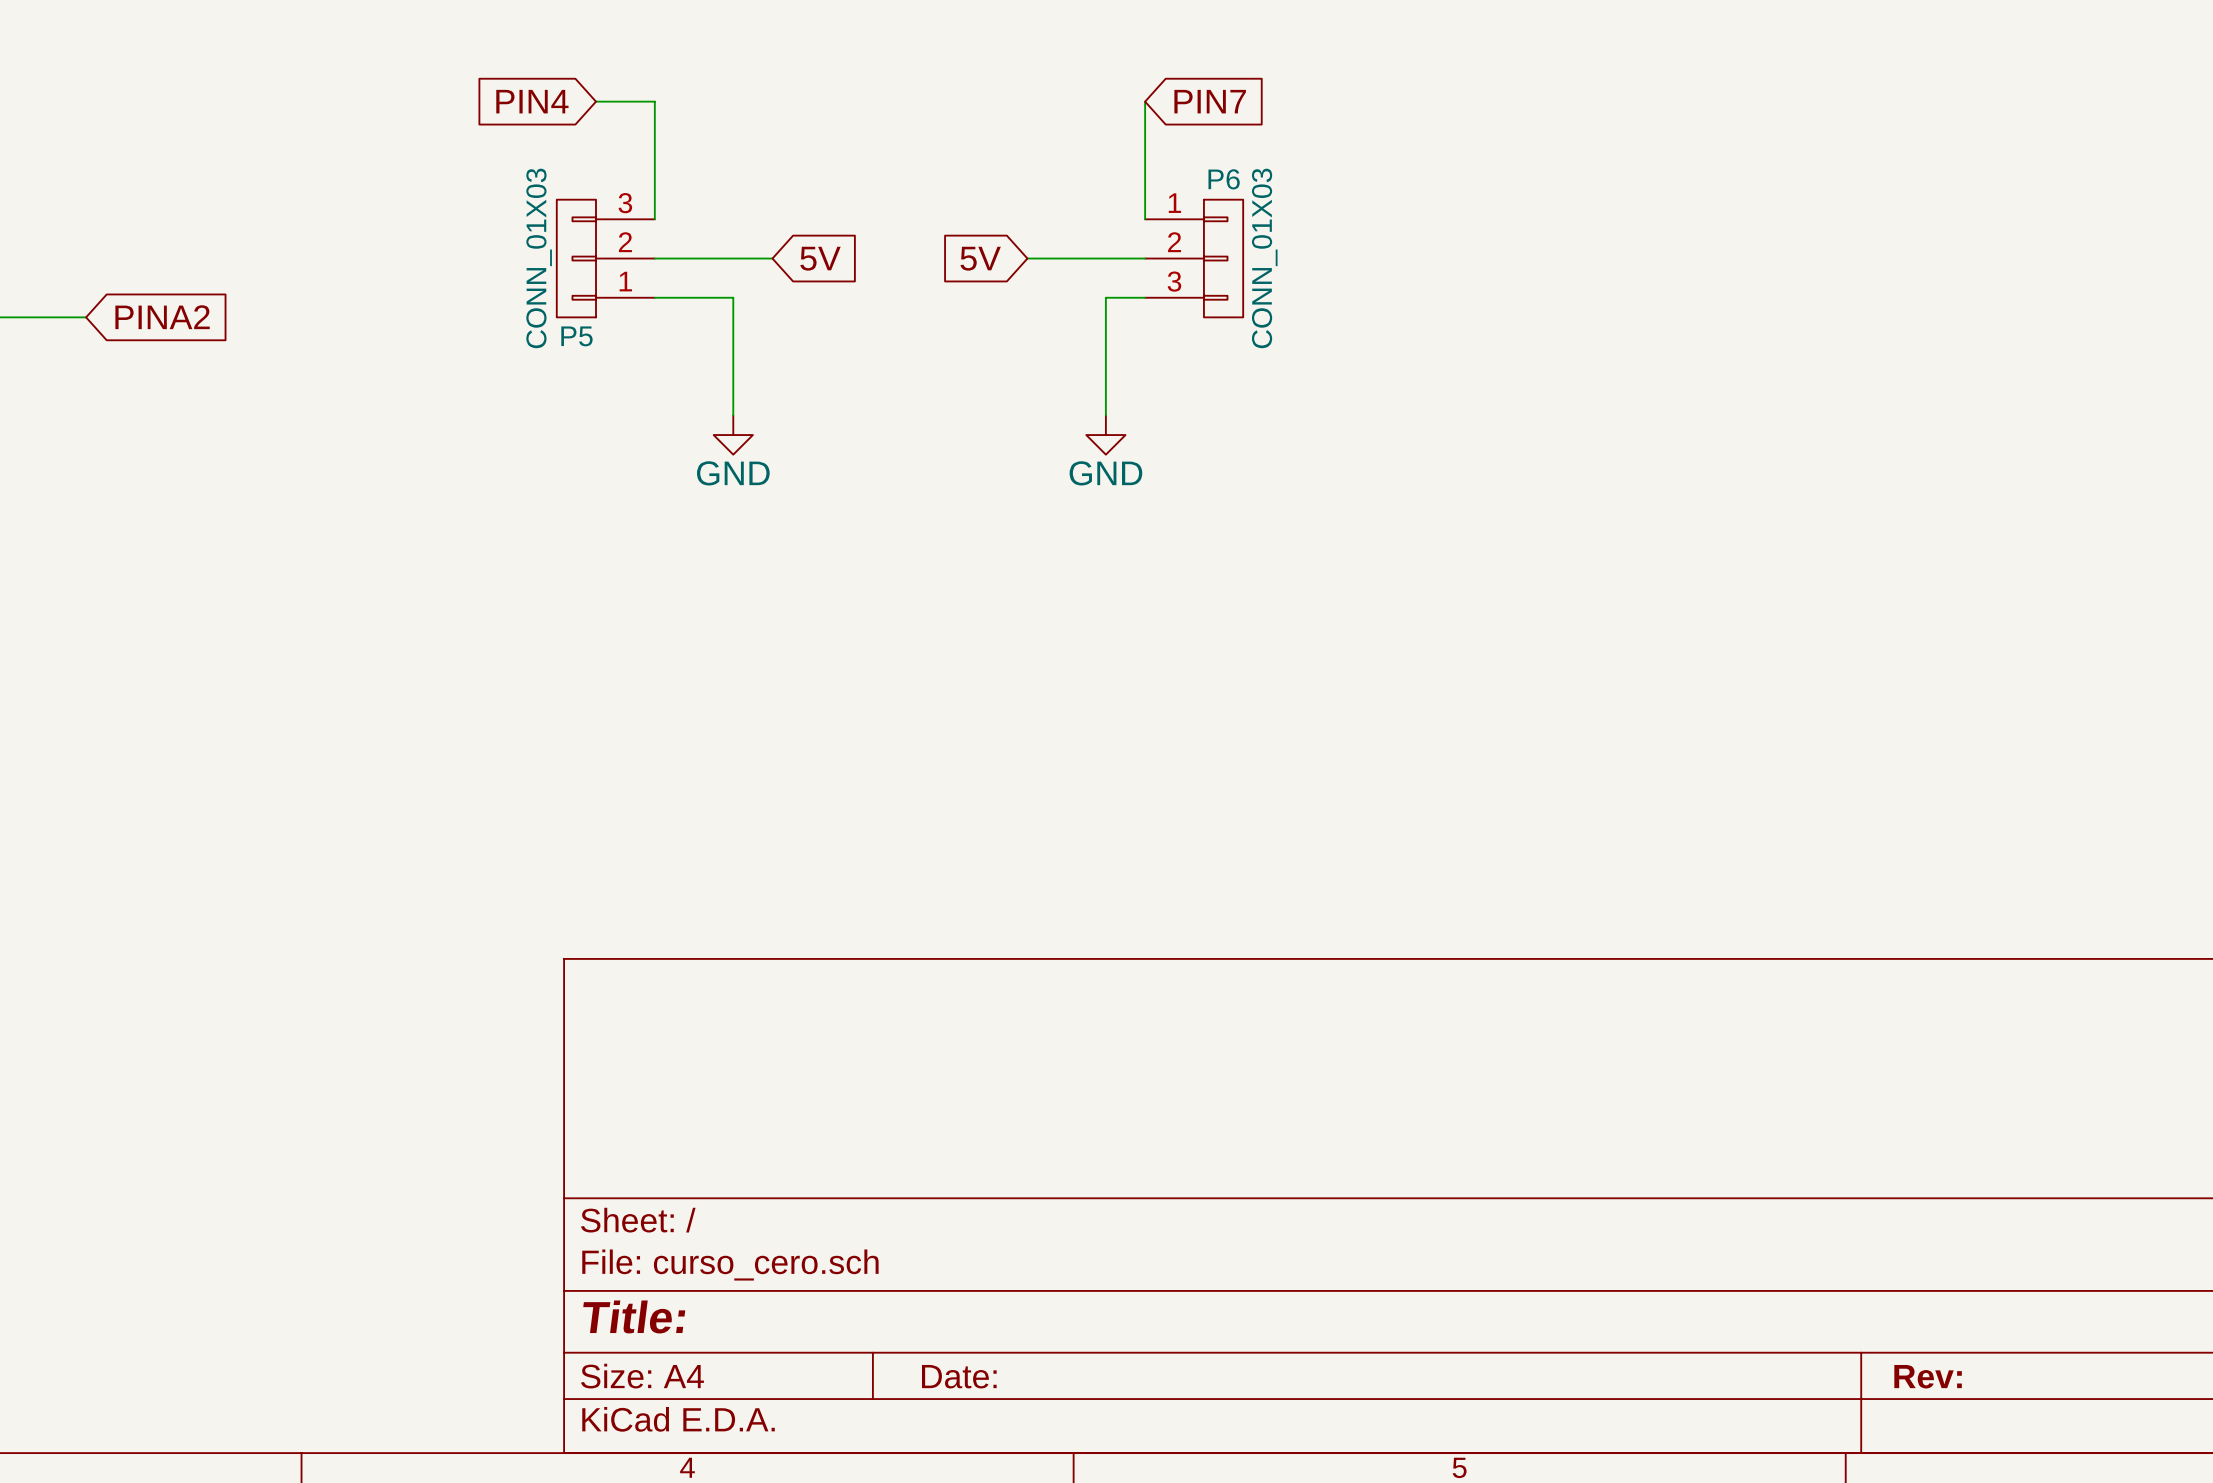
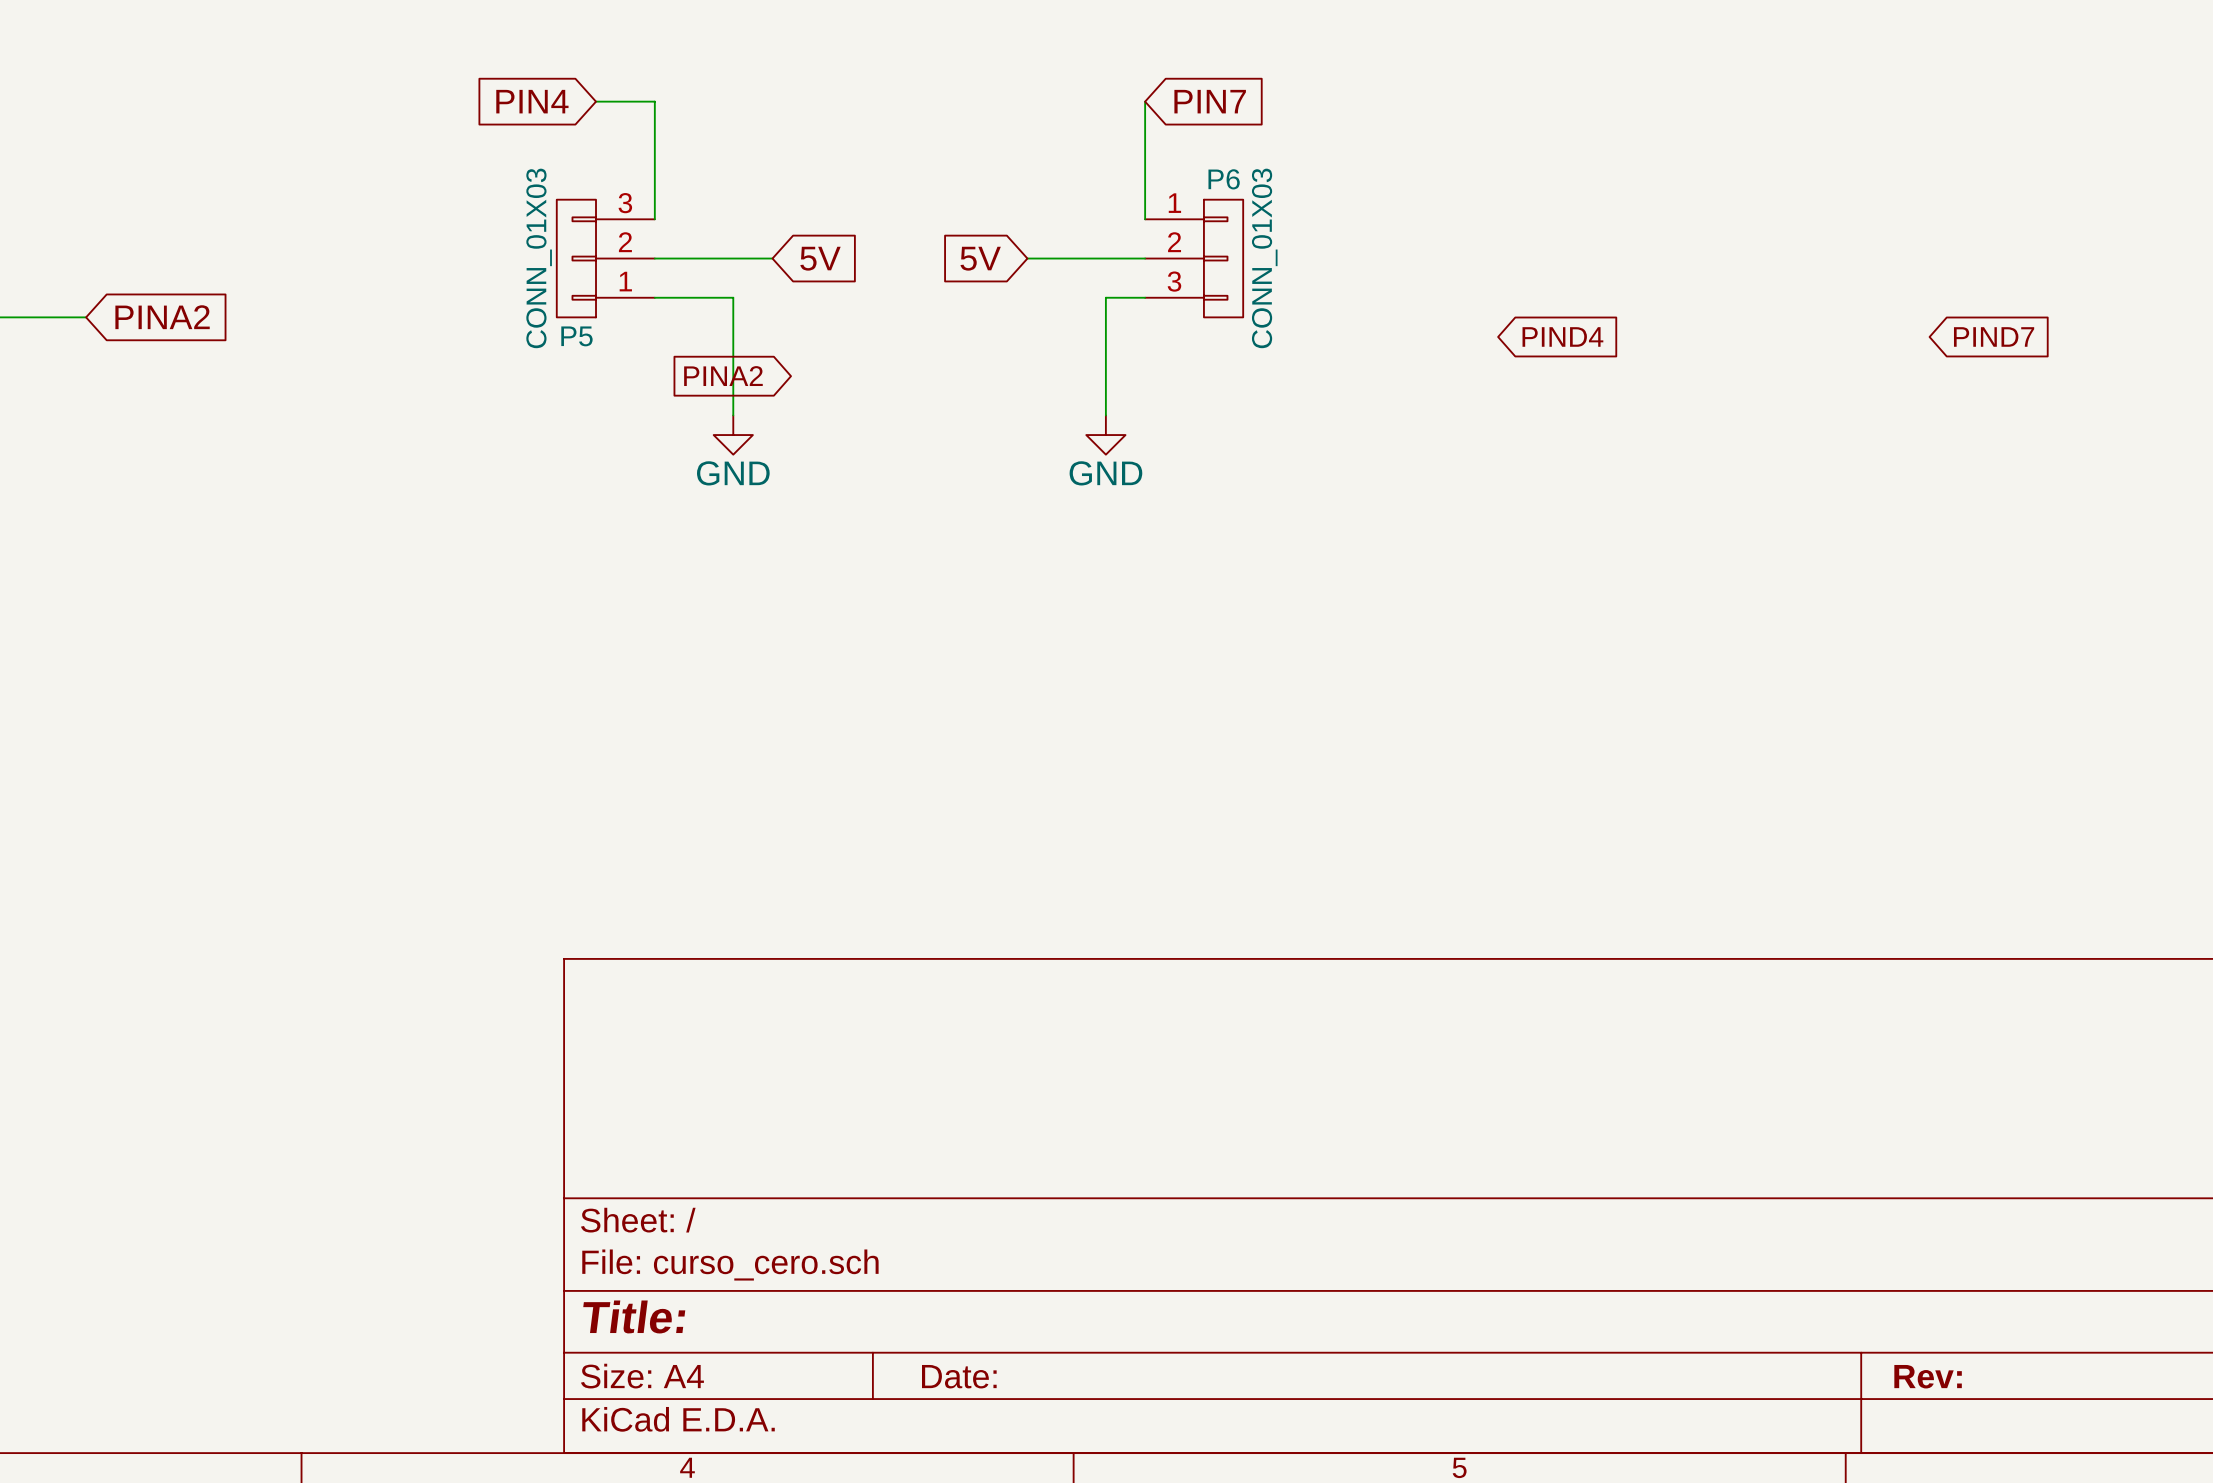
global label: none -> PIND4 (1562, 336)
global label: none -> PIND7 (1994, 336)
global label: none -> PINA2 (723, 376)

